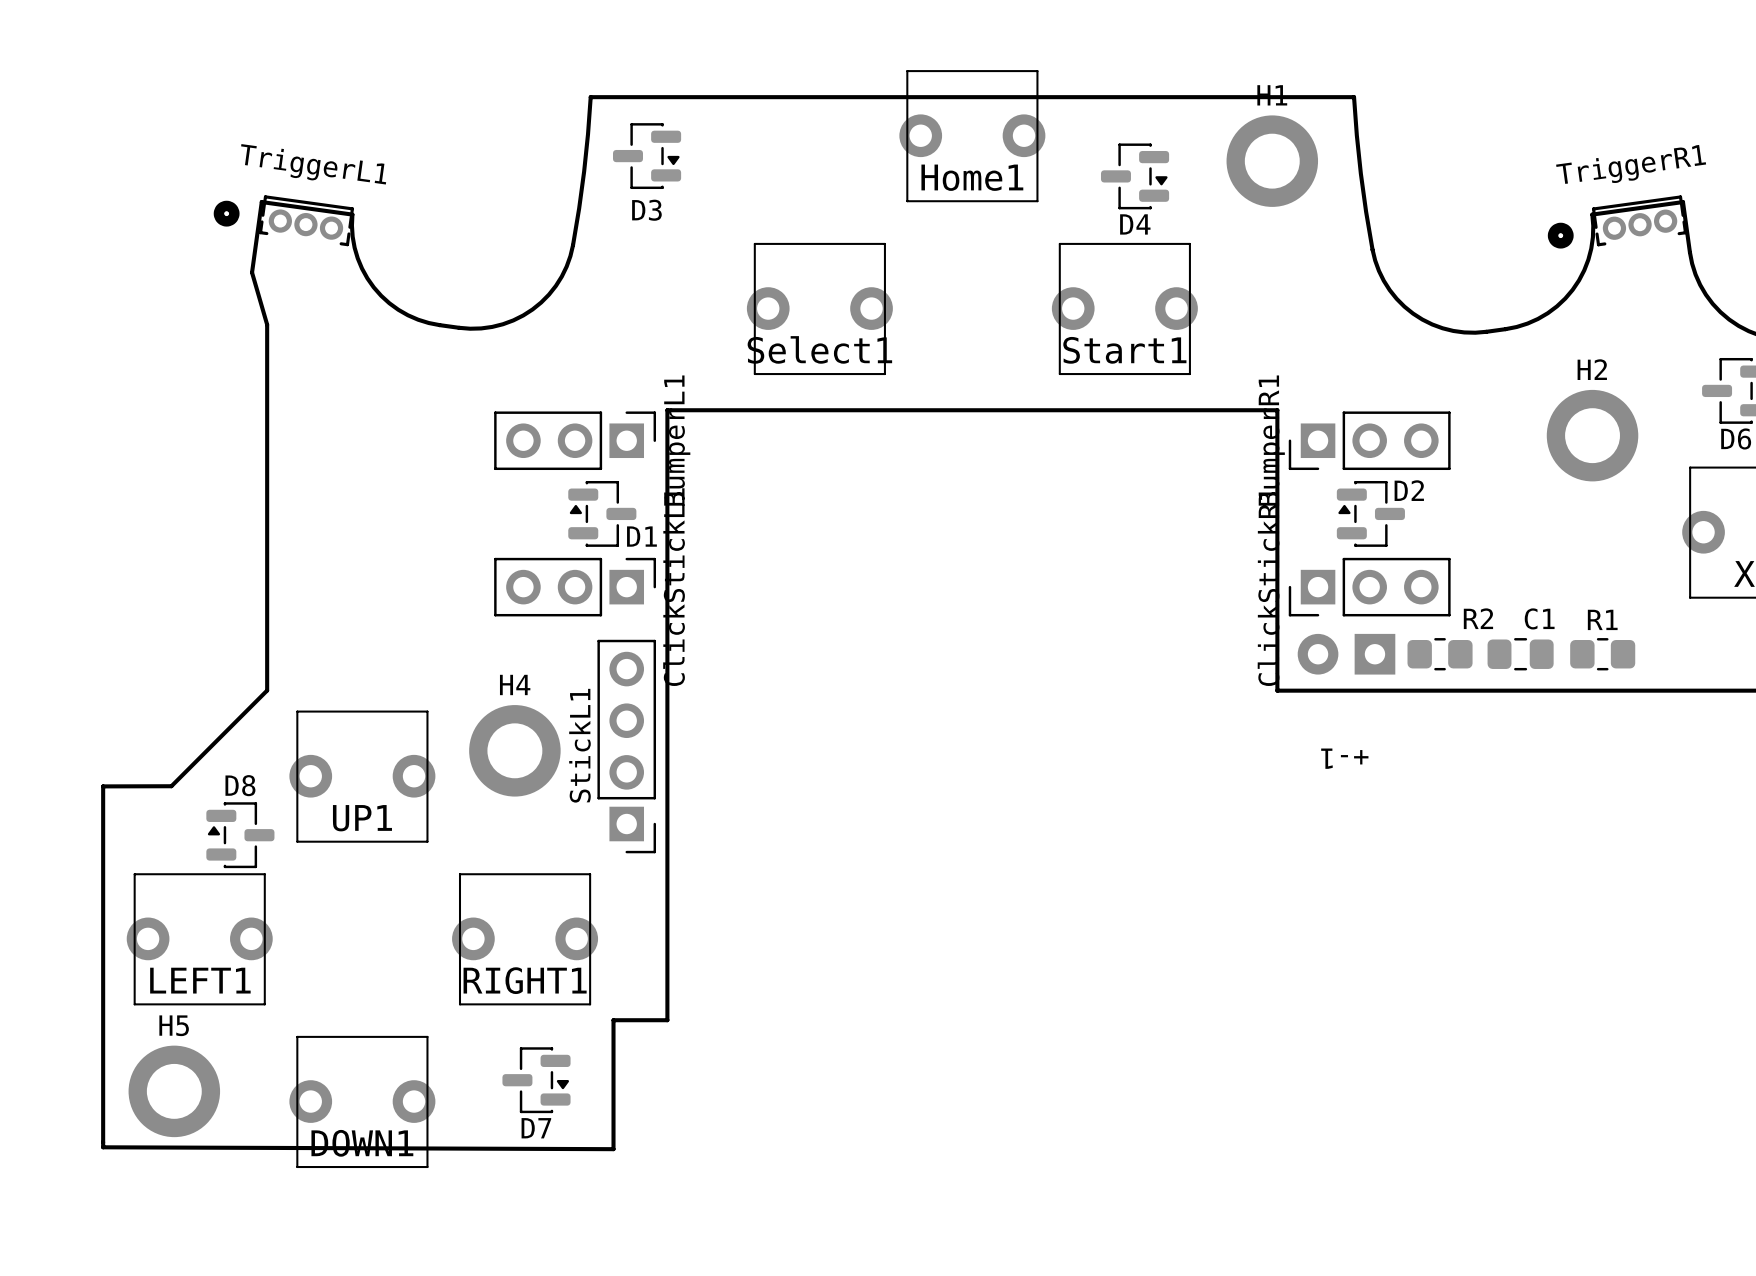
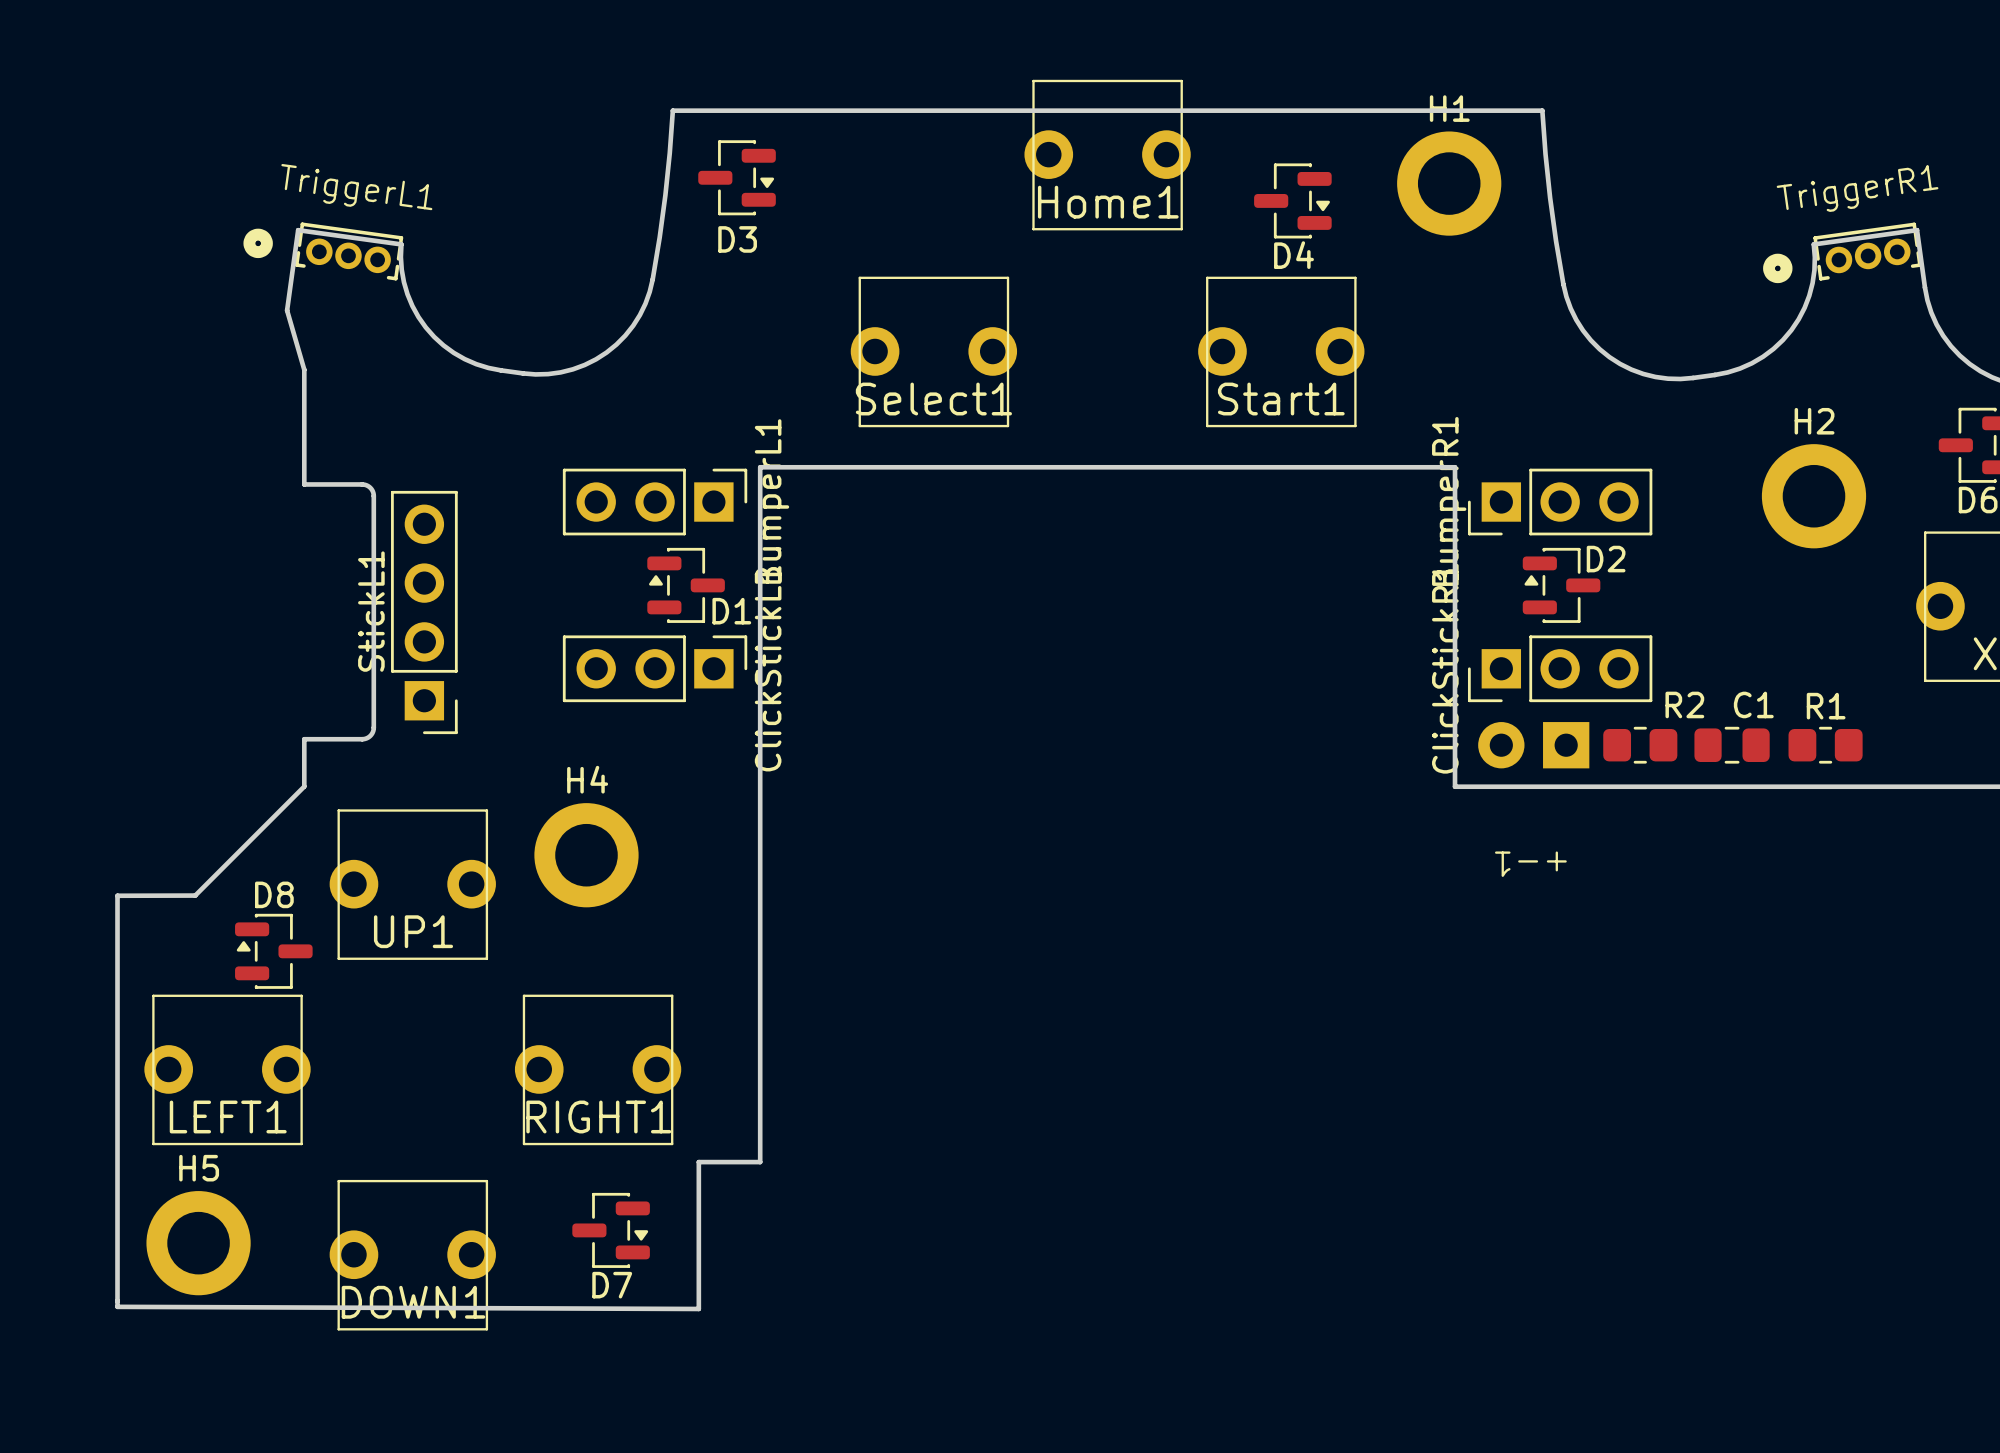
board edge: (267, 425) (267, 648) -> (304, 484) (363, 484) (370, 487) (373, 496) (373, 730) (370, 735) (363, 739) (304, 739)
StickL1 position: (626, 746) -> (424, 612)

